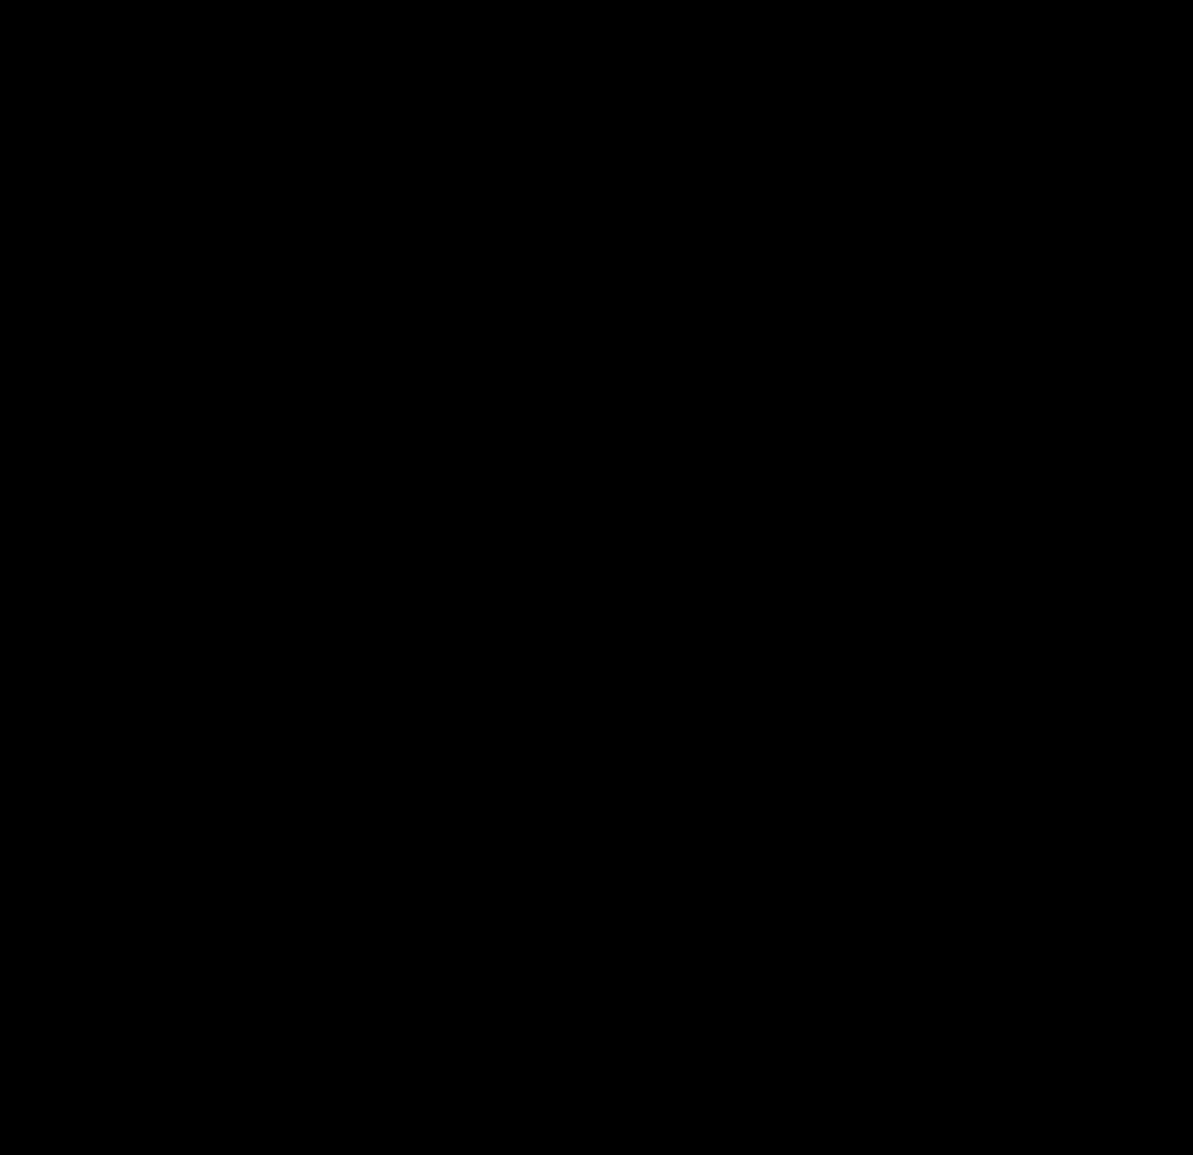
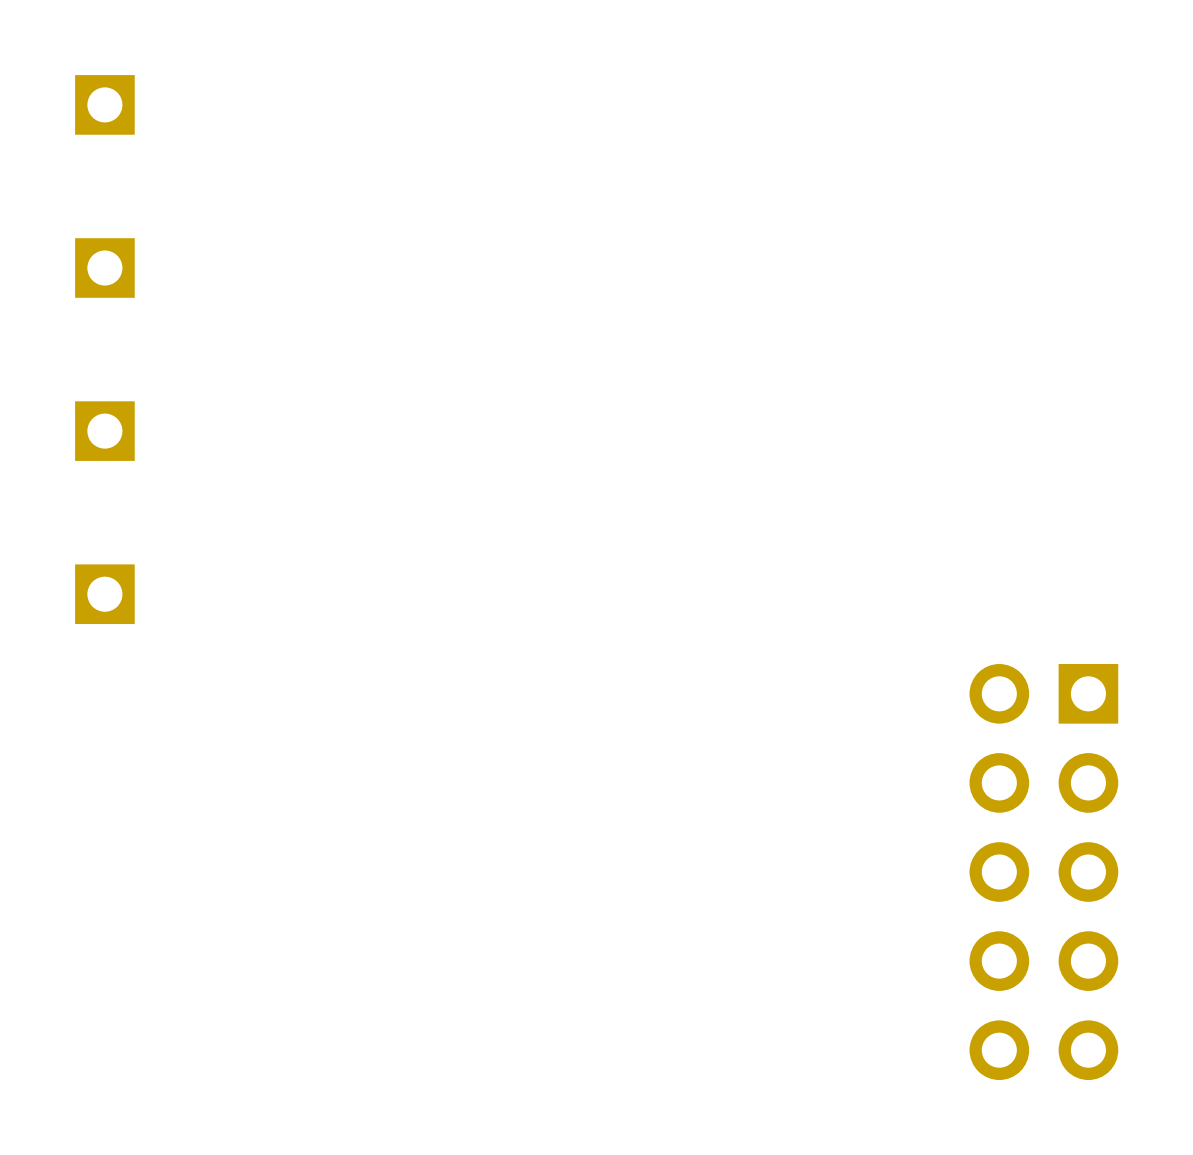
part: none -> (104, 104)
part: none -> (104, 268)
part: none -> (104, 431)
part: none -> (104, 594)
part: none -> (1043, 872)

